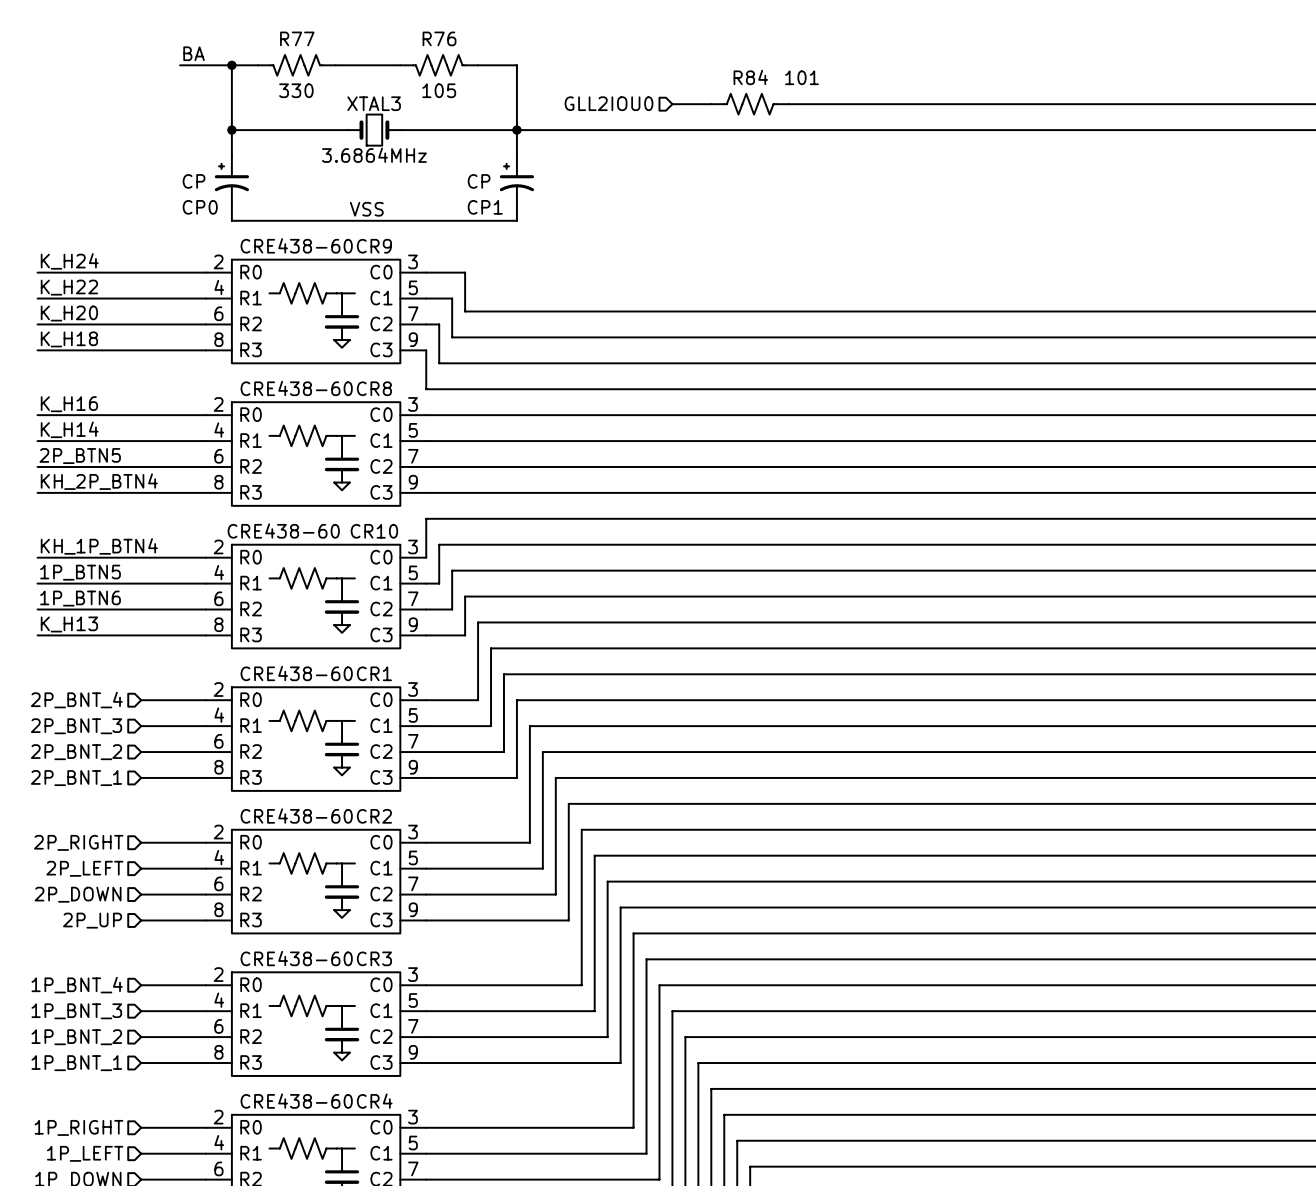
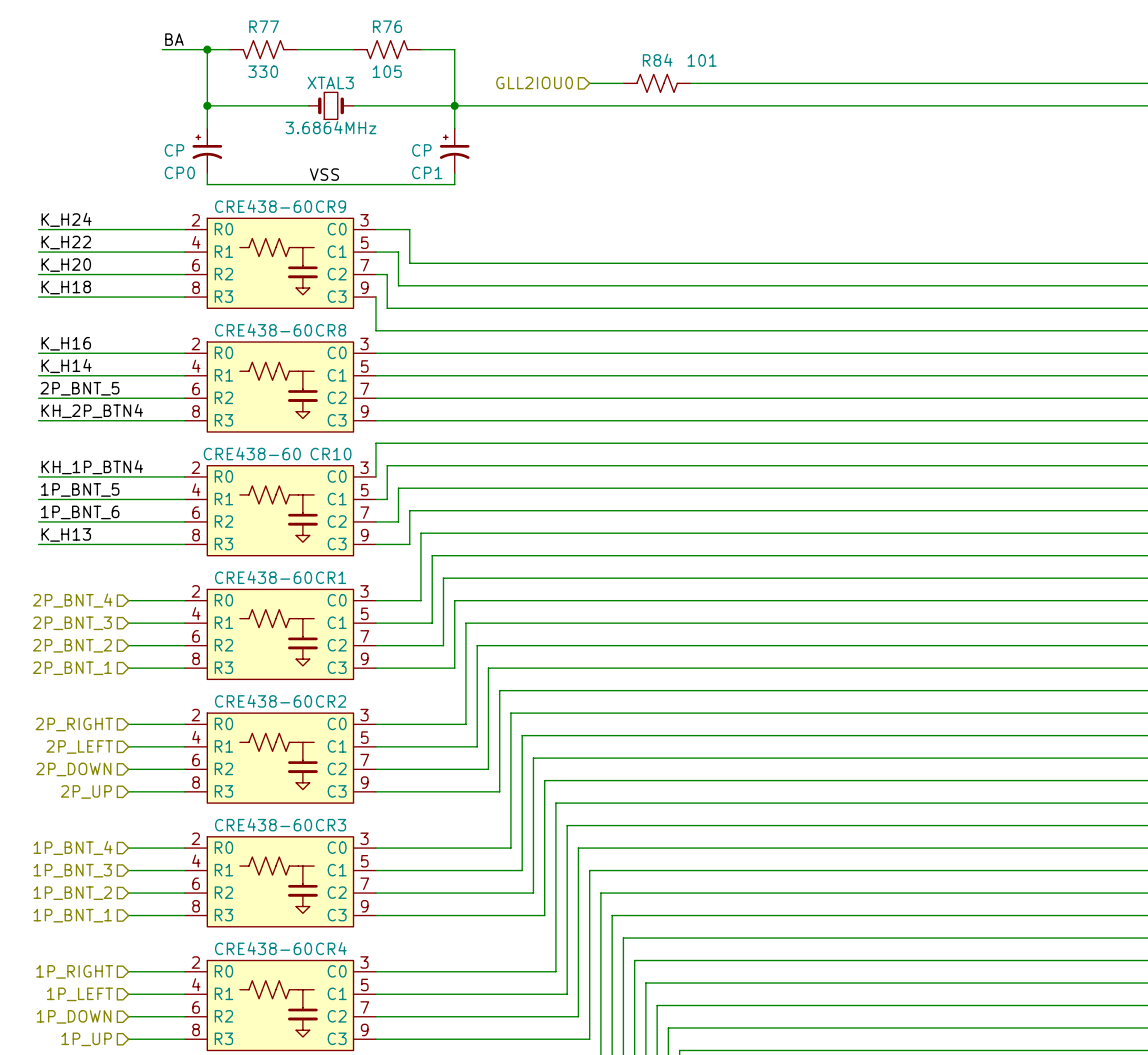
label: 2P_BTN5 (80, 456) -> 2P_BNT_5 (79, 388)
label: 1P_BTN5 (80, 572) -> 1P_BNT_5 (80, 489)
label: 1P_BTN6 (80, 598) -> 1P_BNT_6 (80, 512)

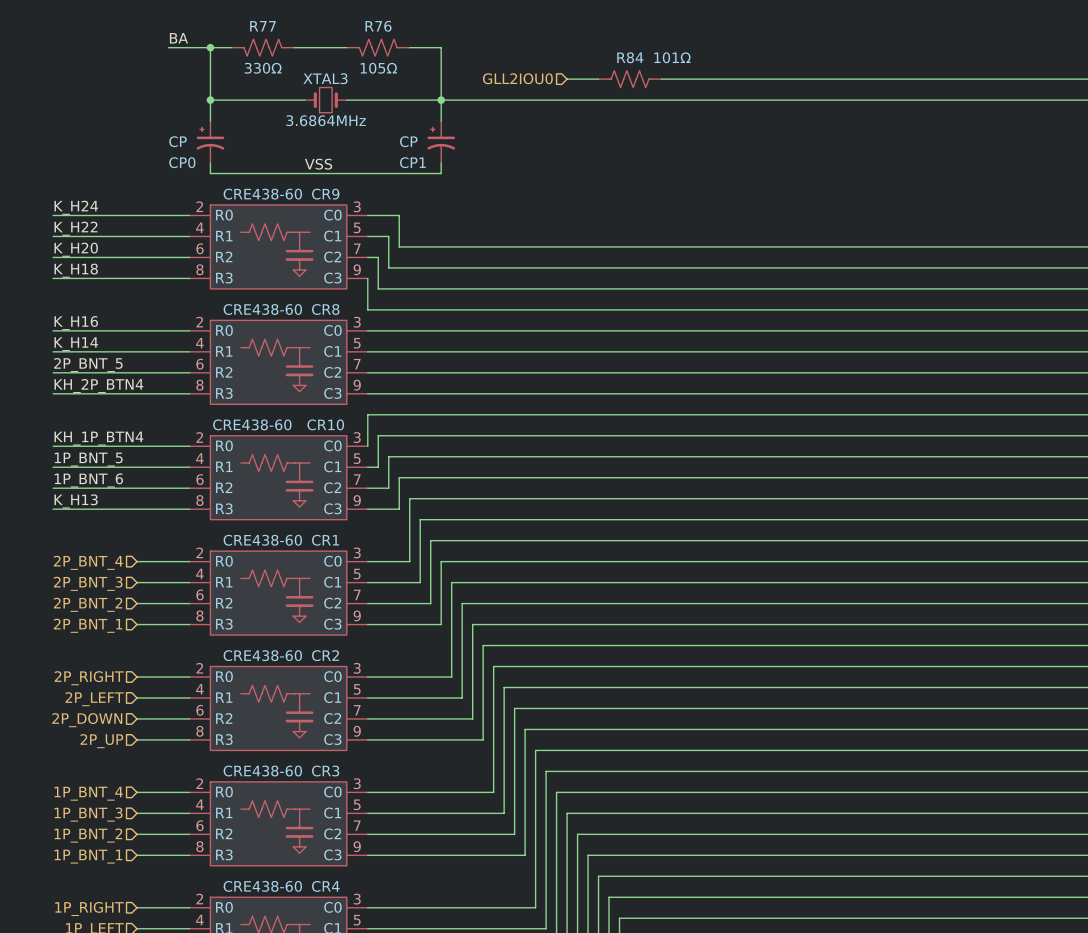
R84 value: 101 (702, 60) -> 101Ω (672, 57)
R77 value: 330 (263, 71) -> 330Ω (263, 68)
R76 value: 105 (387, 71) -> 105Ω (378, 68)

